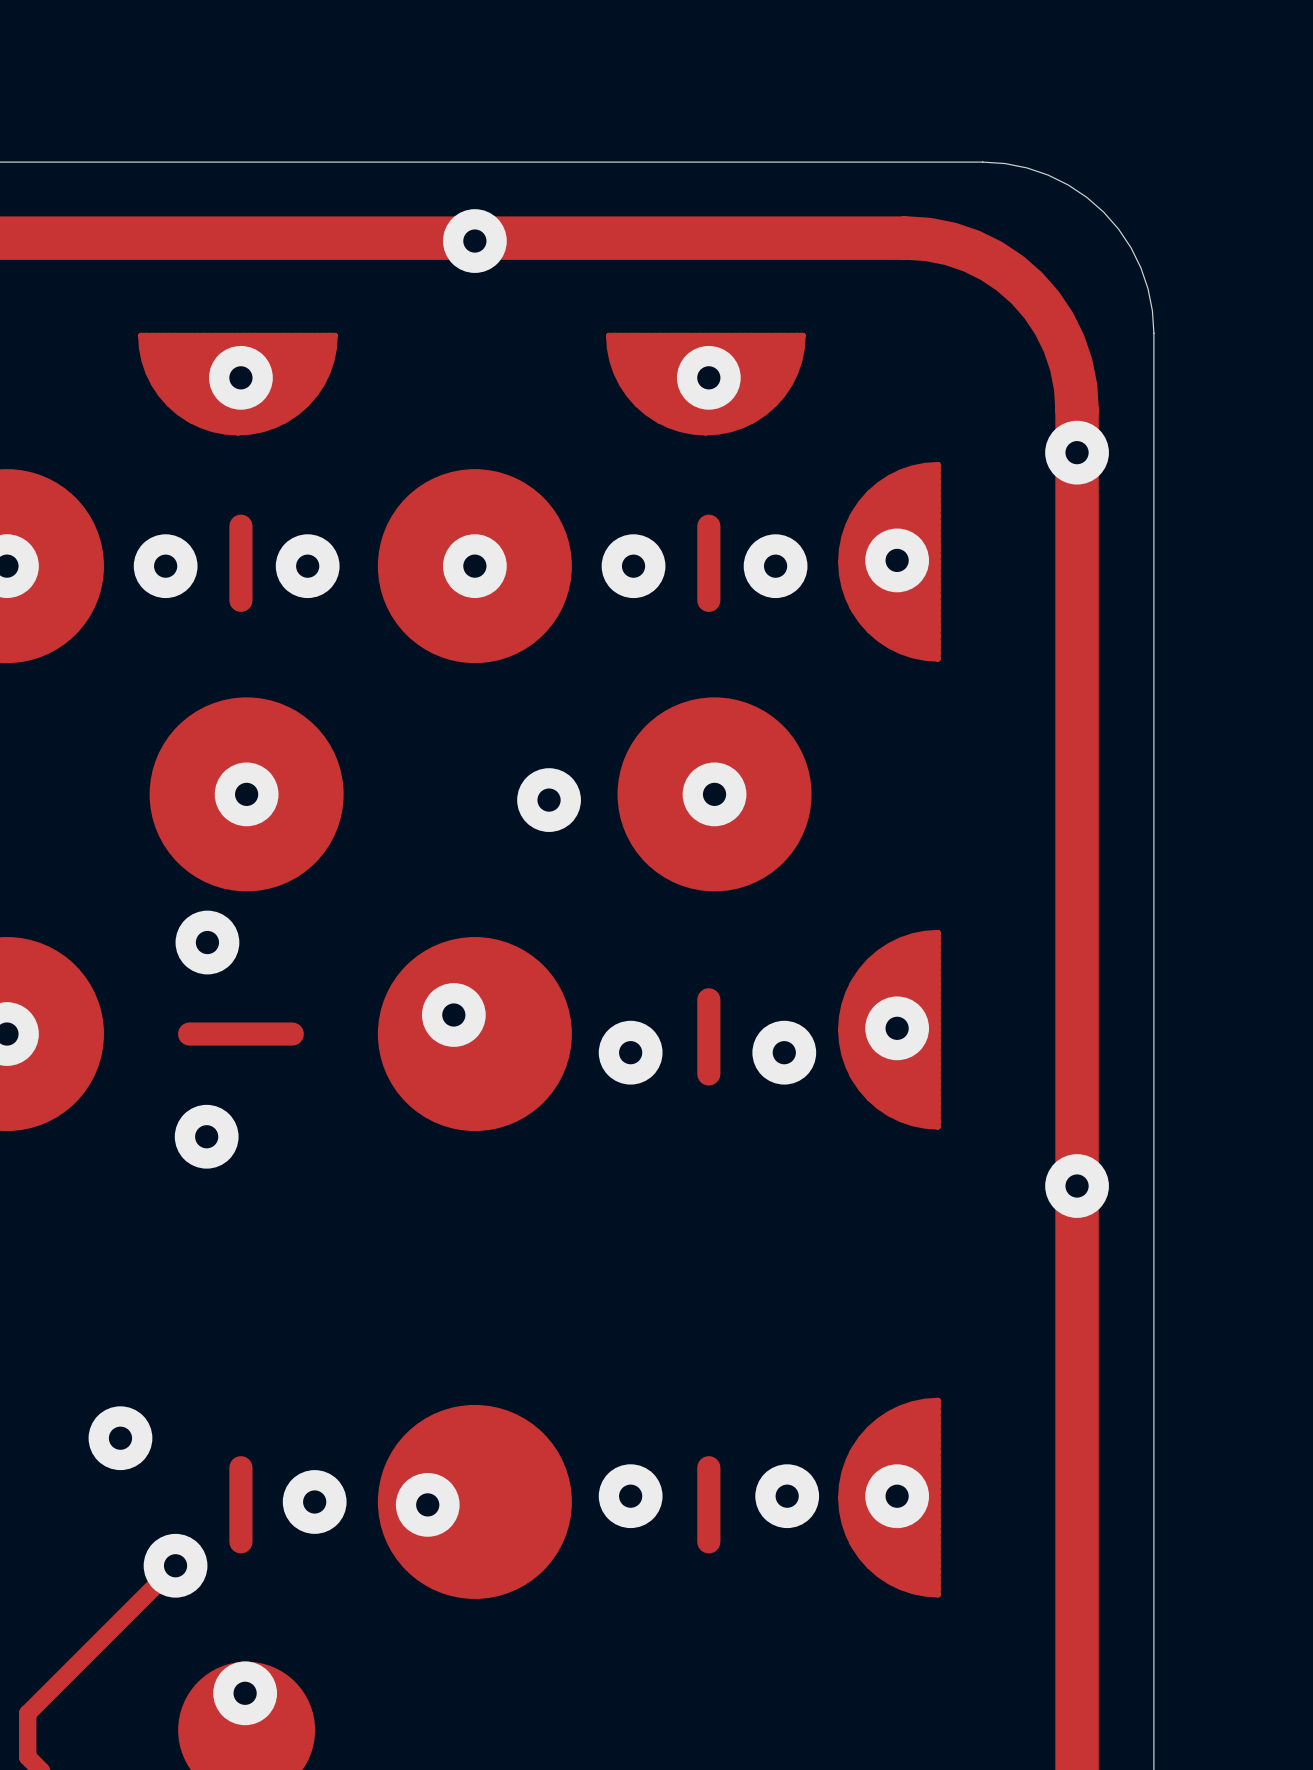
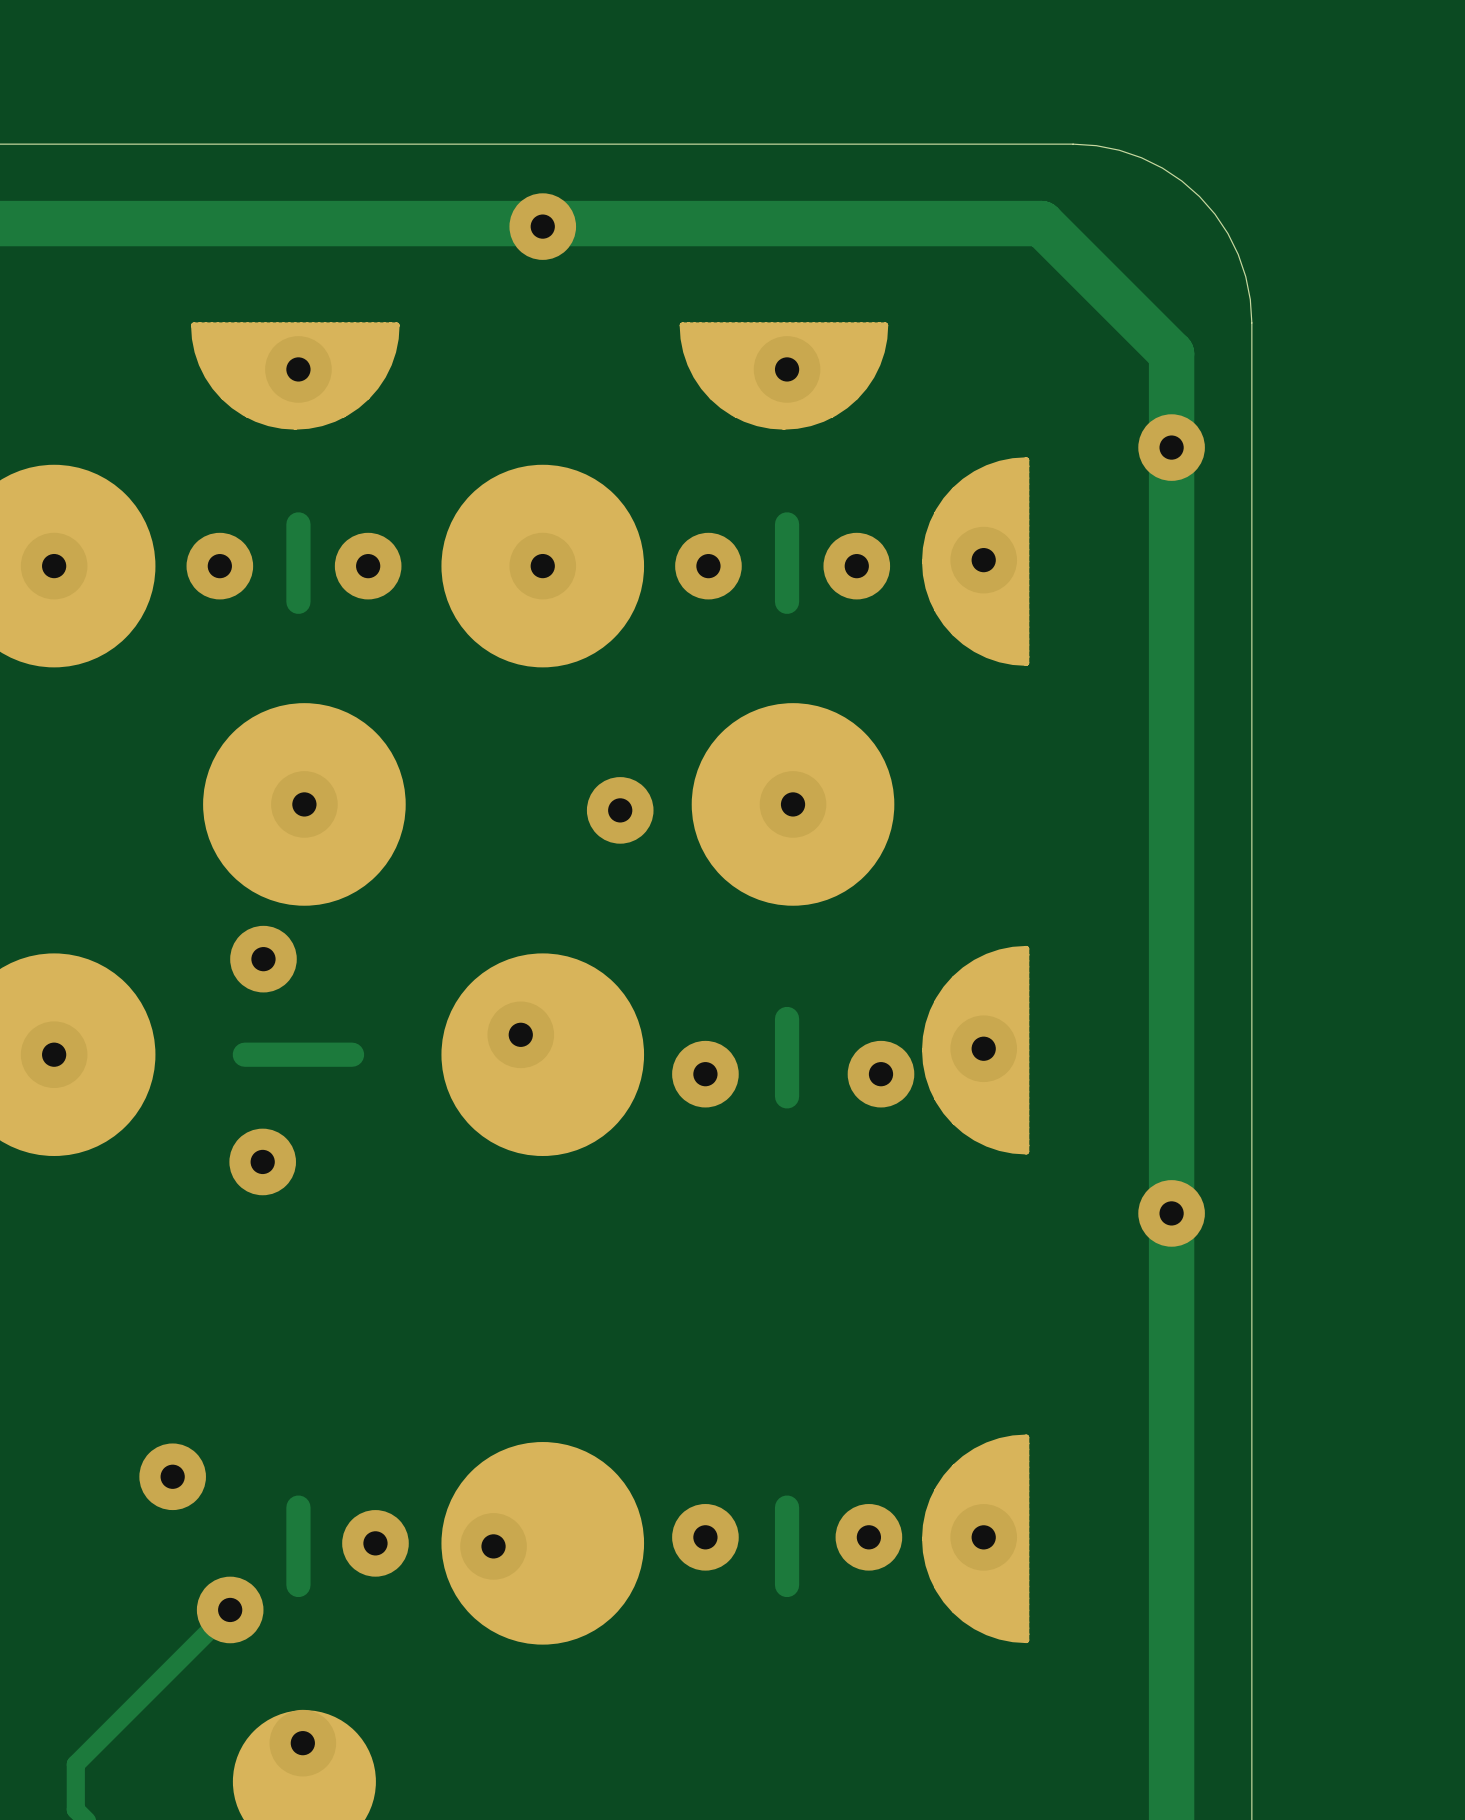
track: (905, 237) (950, 243) (971, 251) (991, 260) (1026, 288) (1041, 304) (1064, 343) (1071, 364) (1077, 409) -> (989, 223) (1041, 223) (1171, 353) (1171, 405)
via position: (784, 1052) -> (881, 1074)

